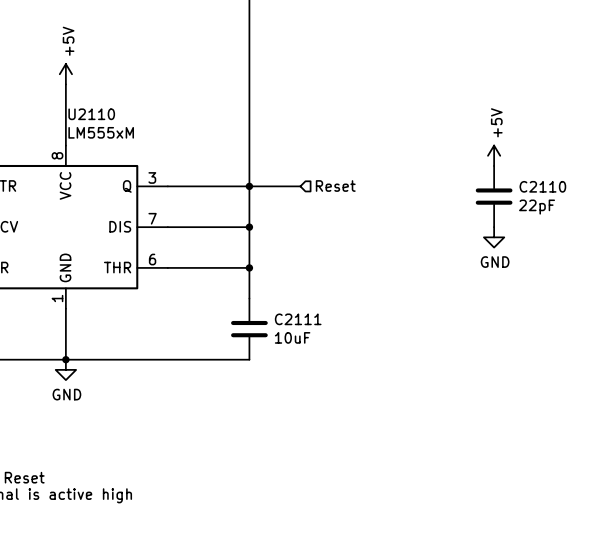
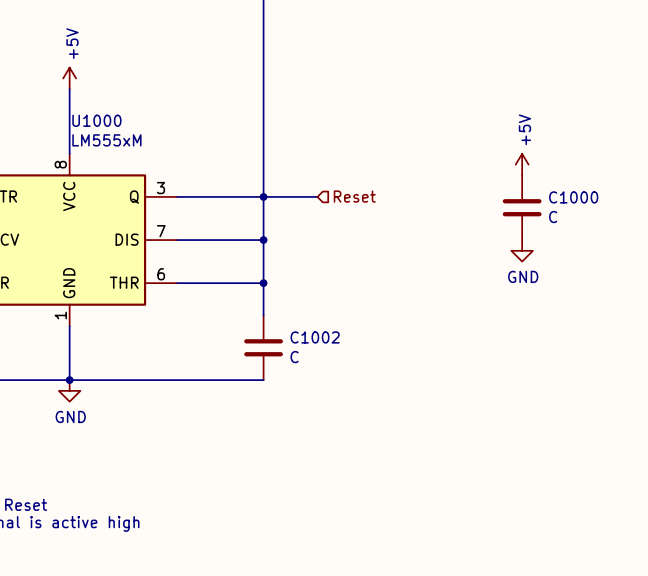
U2110 name: U2110 (91, 114) -> U1000 (96, 120)
C2110 name: C2110 (542, 186) -> C1000 (573, 197)
C2110 value: 22pF (537, 207) -> C (553, 217)
C2111 name: C2111 (298, 319) -> C1002 (315, 337)
C2111 value: 10uF (292, 337) -> C (294, 357)

